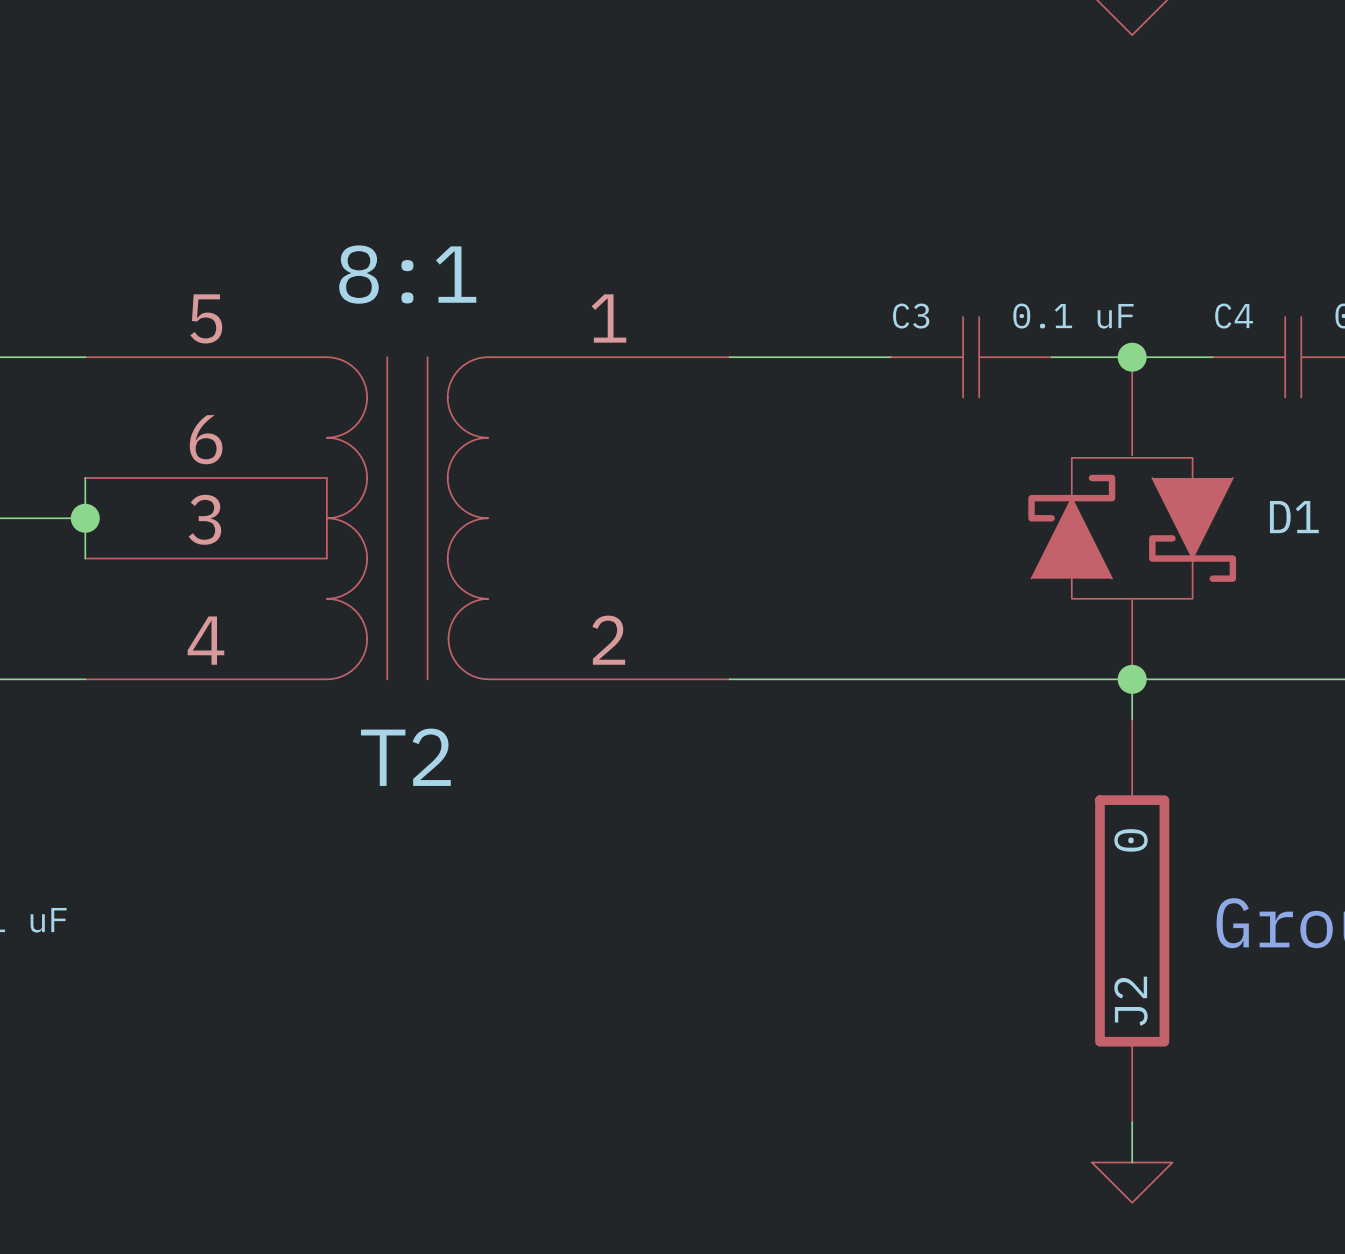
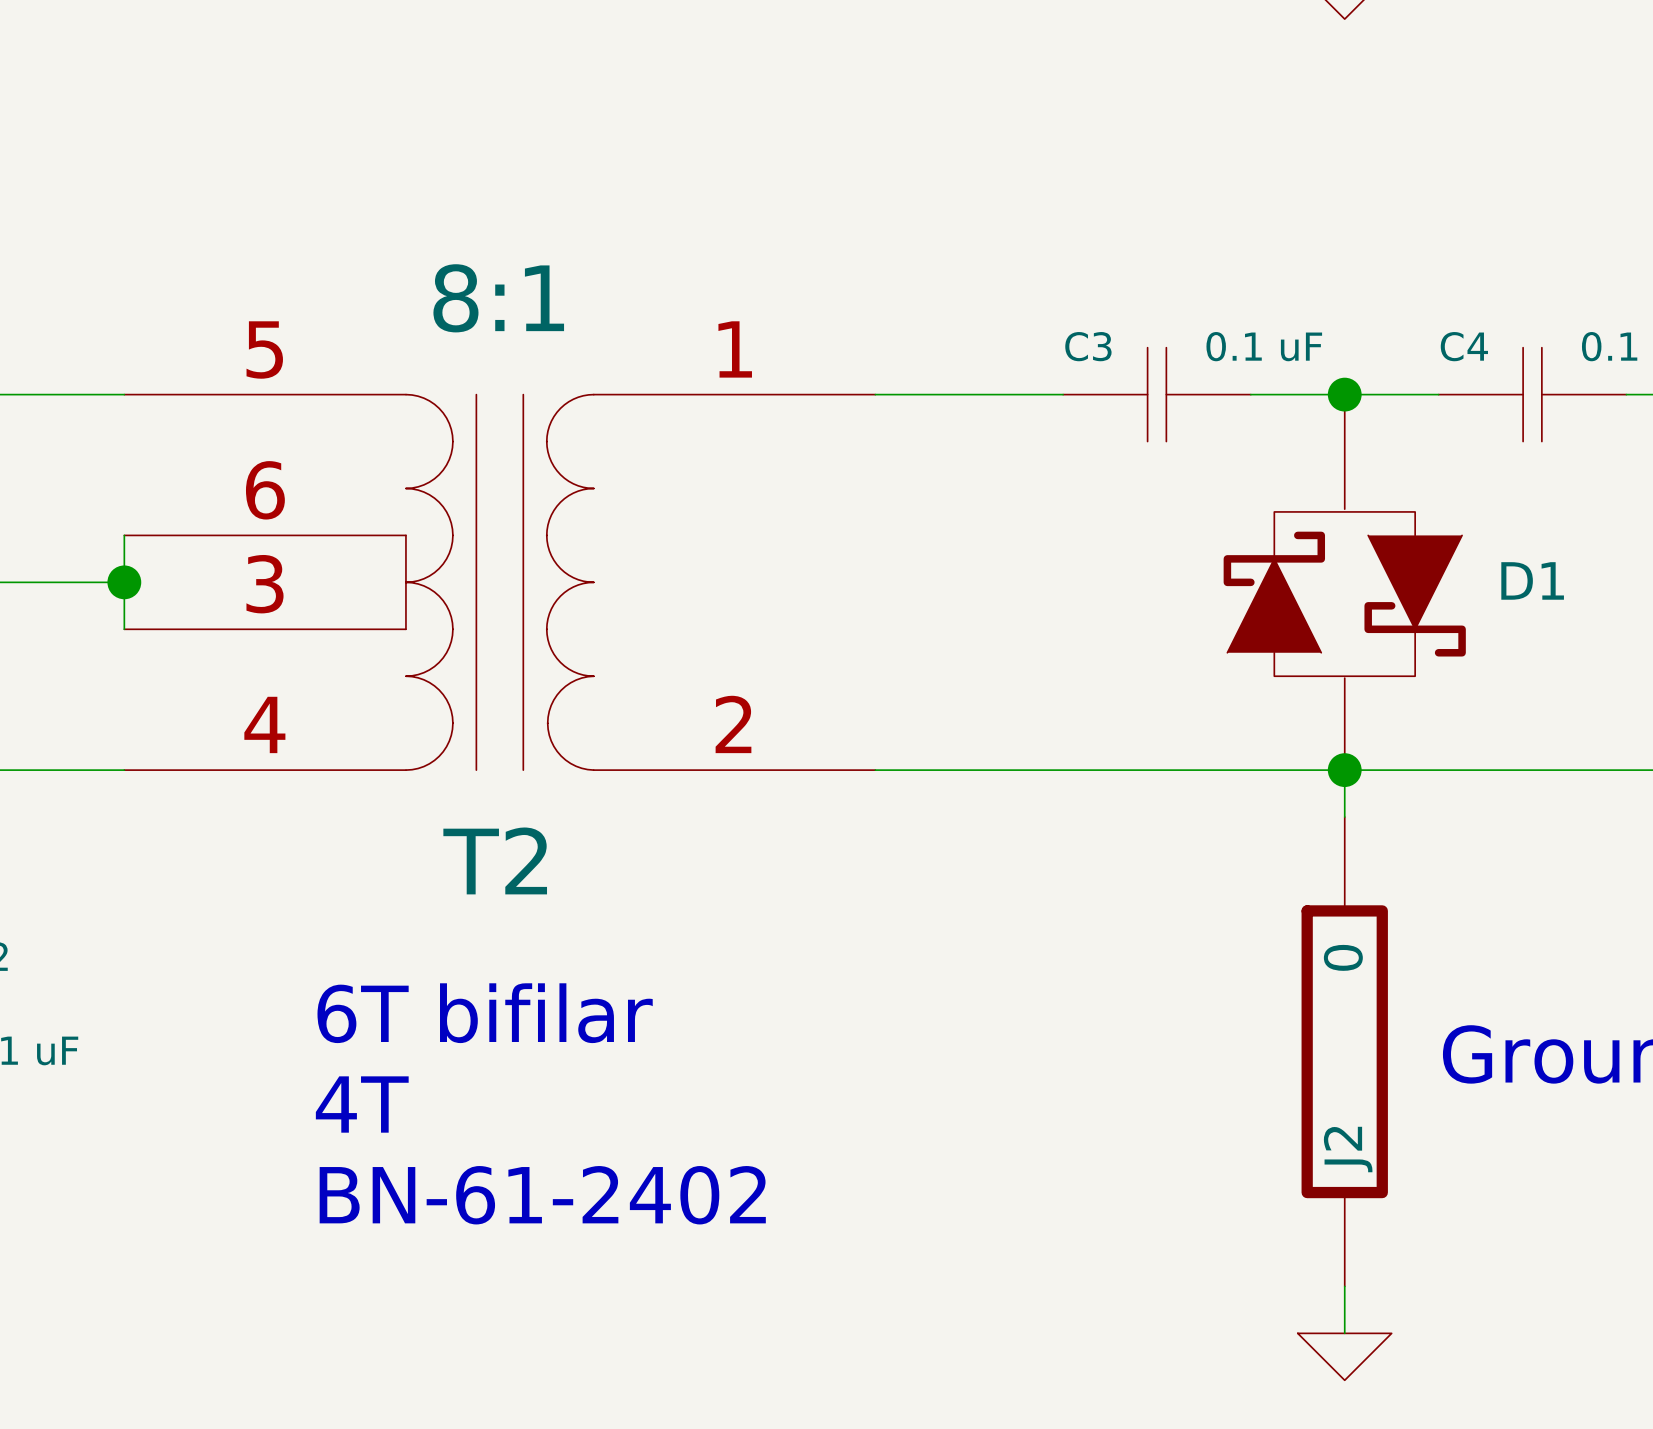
text: none -> 6T bifilar (485, 1013)
text: none -> 4T (362, 1104)
text: none -> BN-61-2402 (542, 1195)

